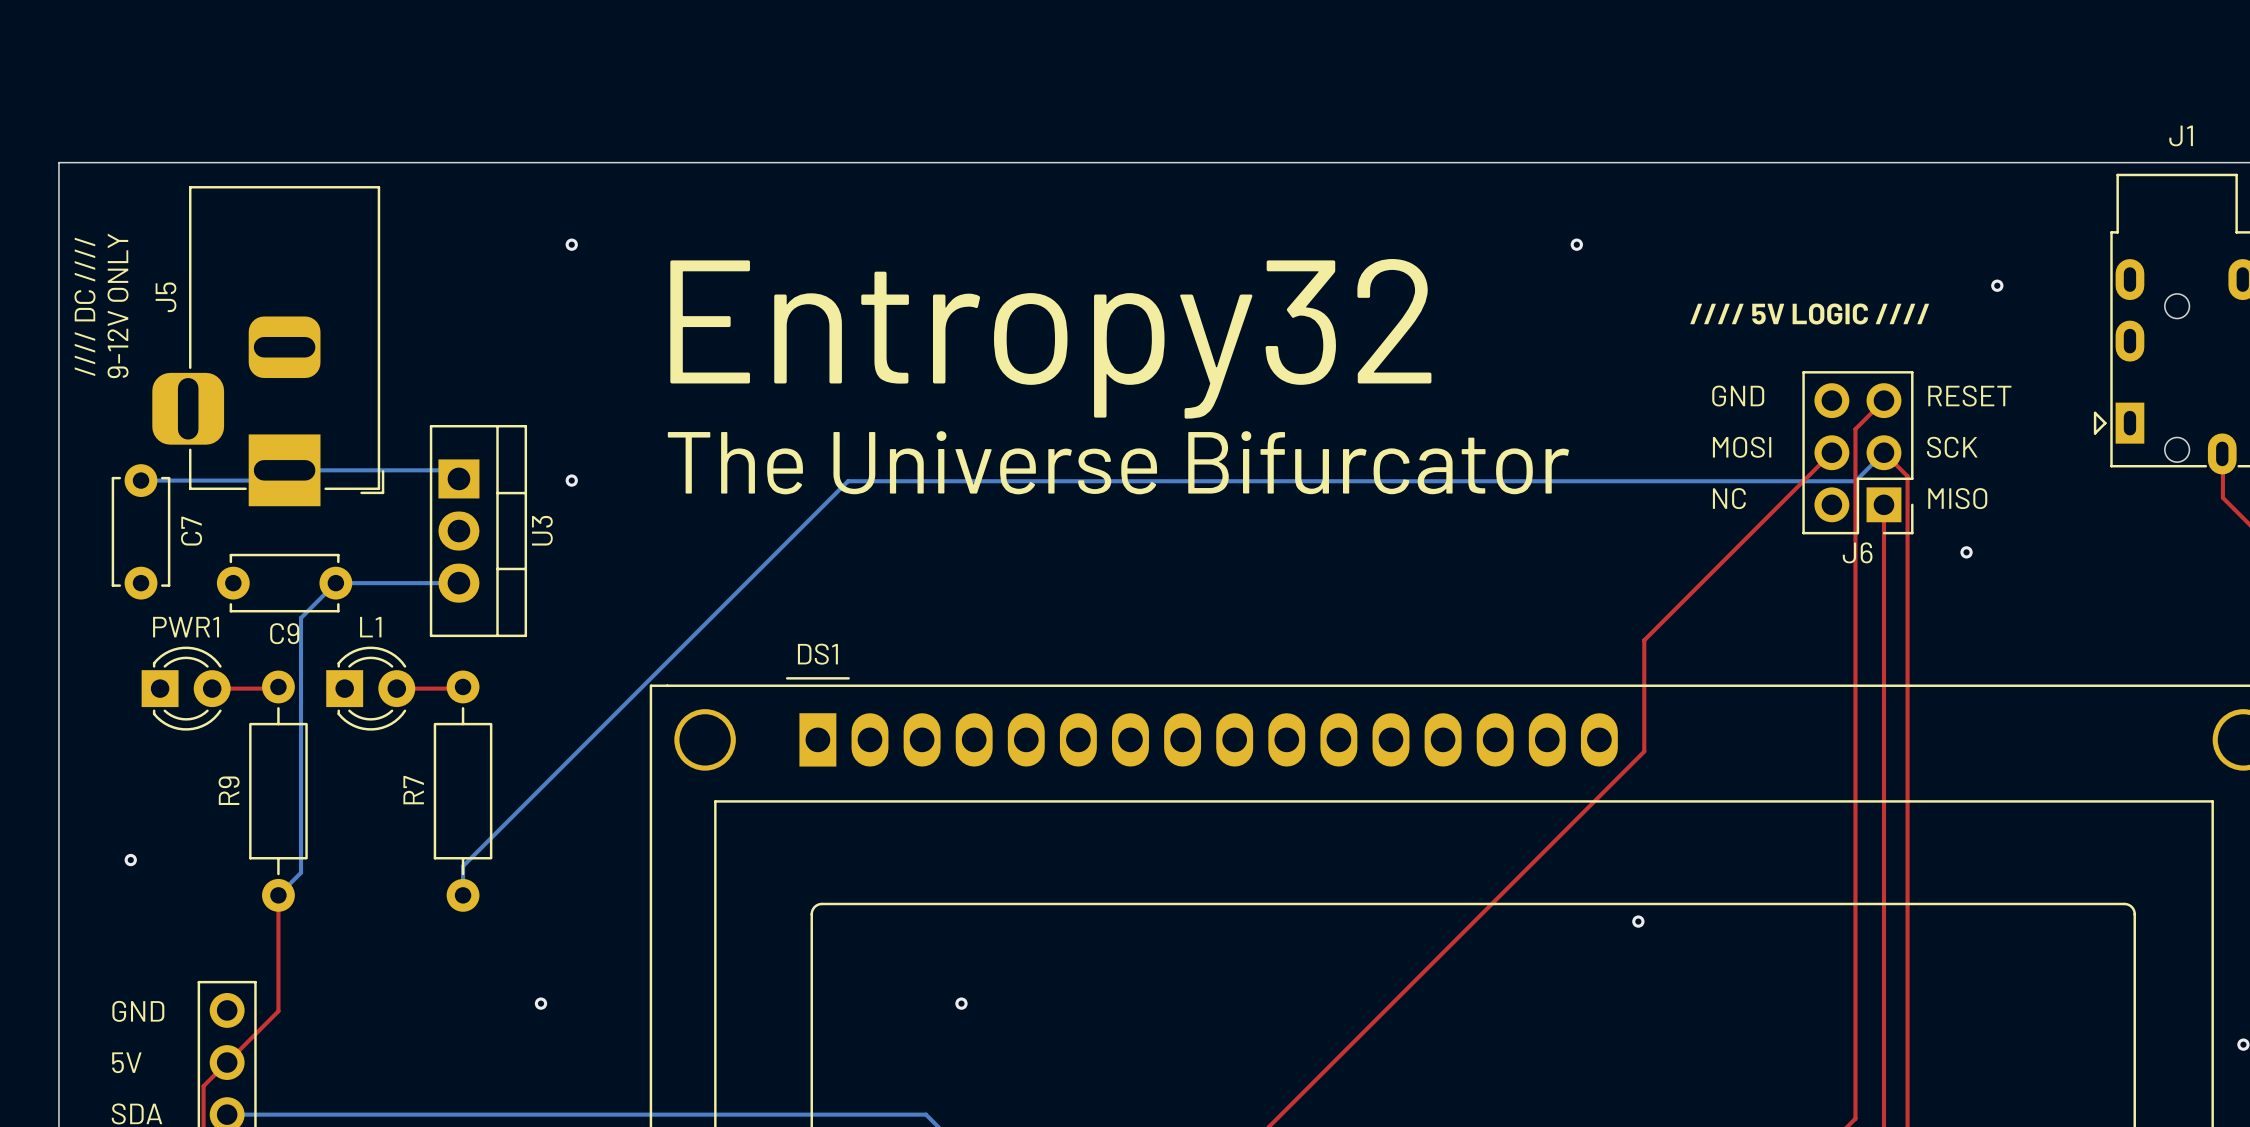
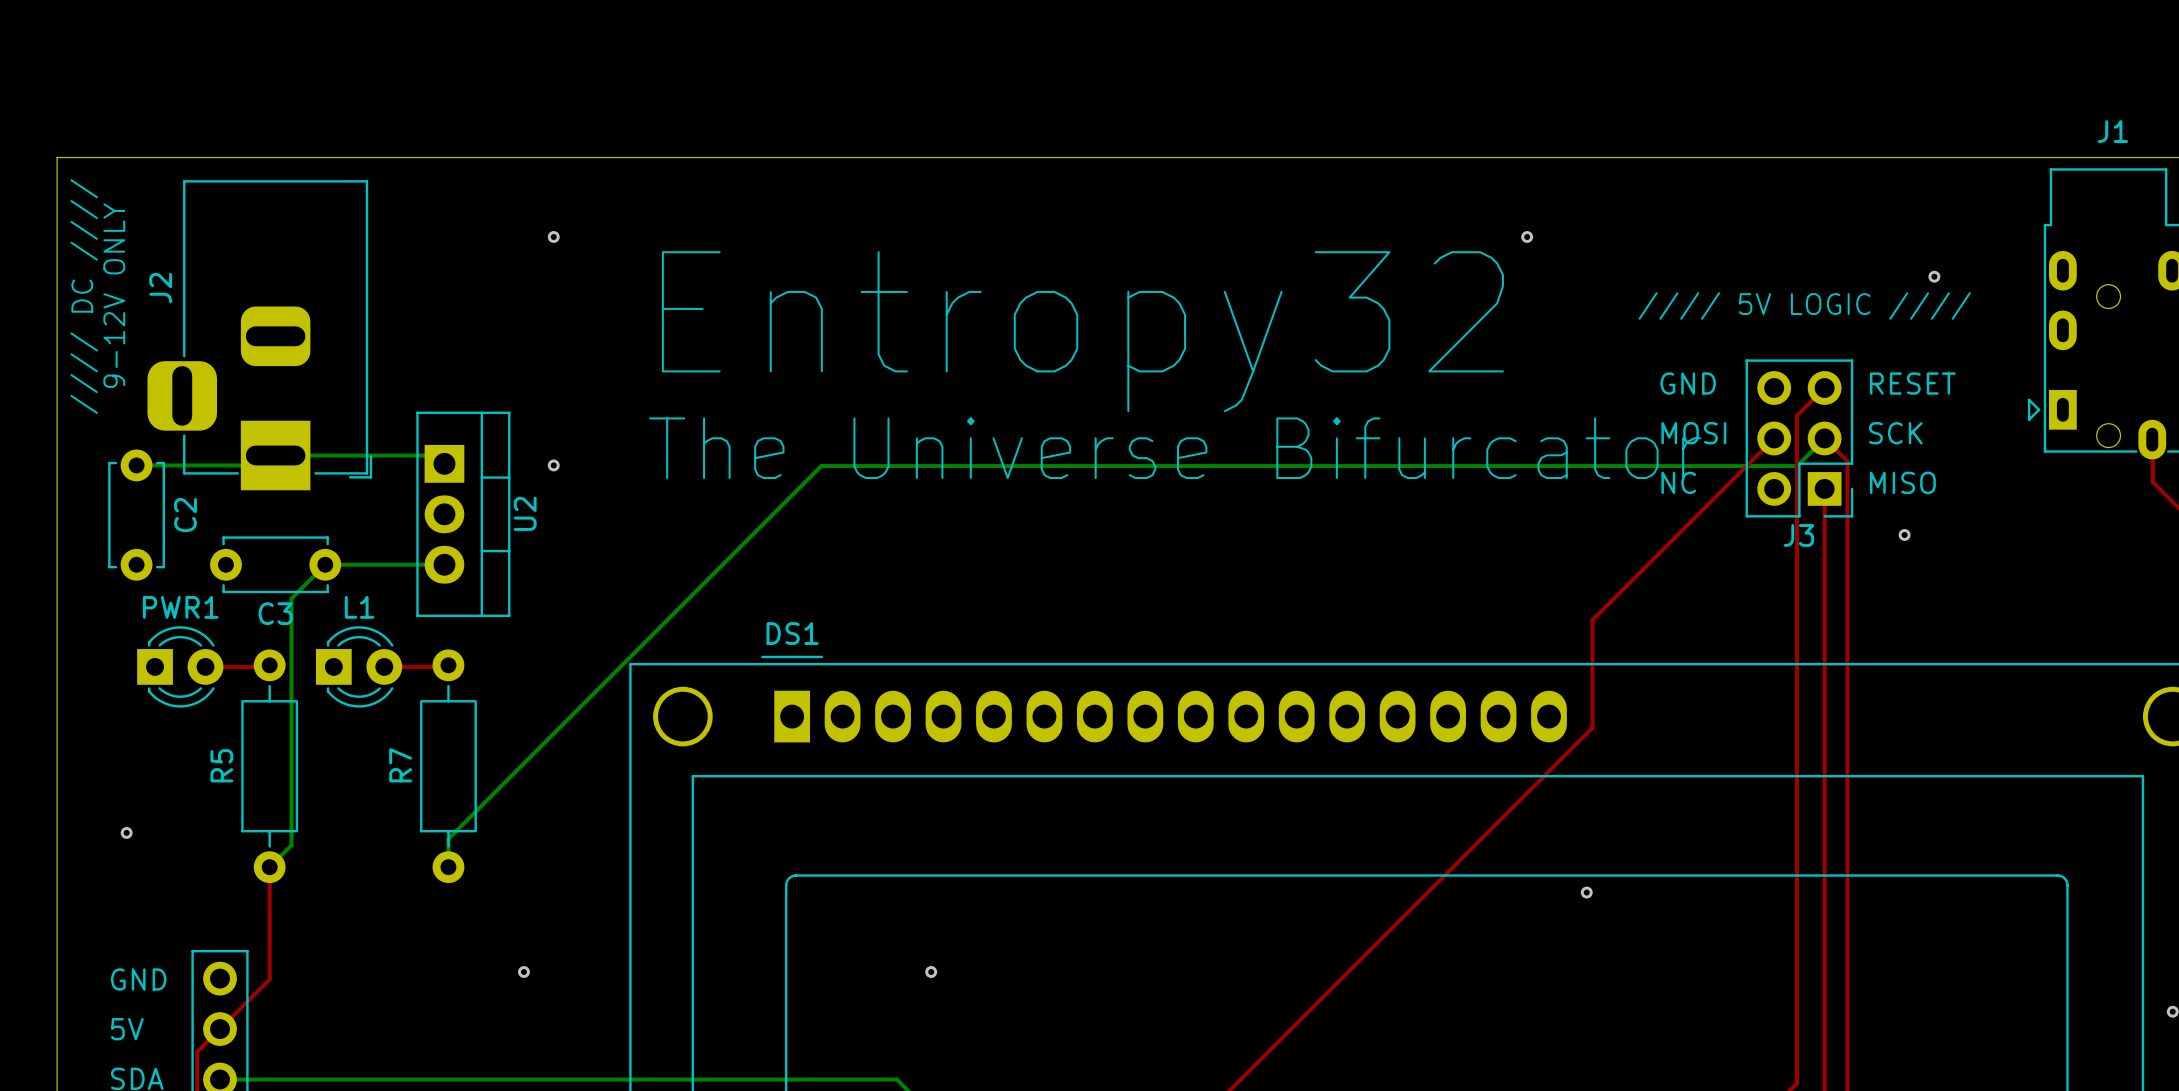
J5 name: J5 (166, 297) -> J2 (160, 288)
U3 name: U3 (542, 530) -> U2 (525, 513)
C7 name: C7 (191, 531) -> C2 (185, 515)
J6 name: J6 (1857, 552) -> J3 (1798, 535)
C9 name: C9 (284, 633) -> C3 (275, 613)
R9 name: R9 (229, 790) -> R5 (221, 765)

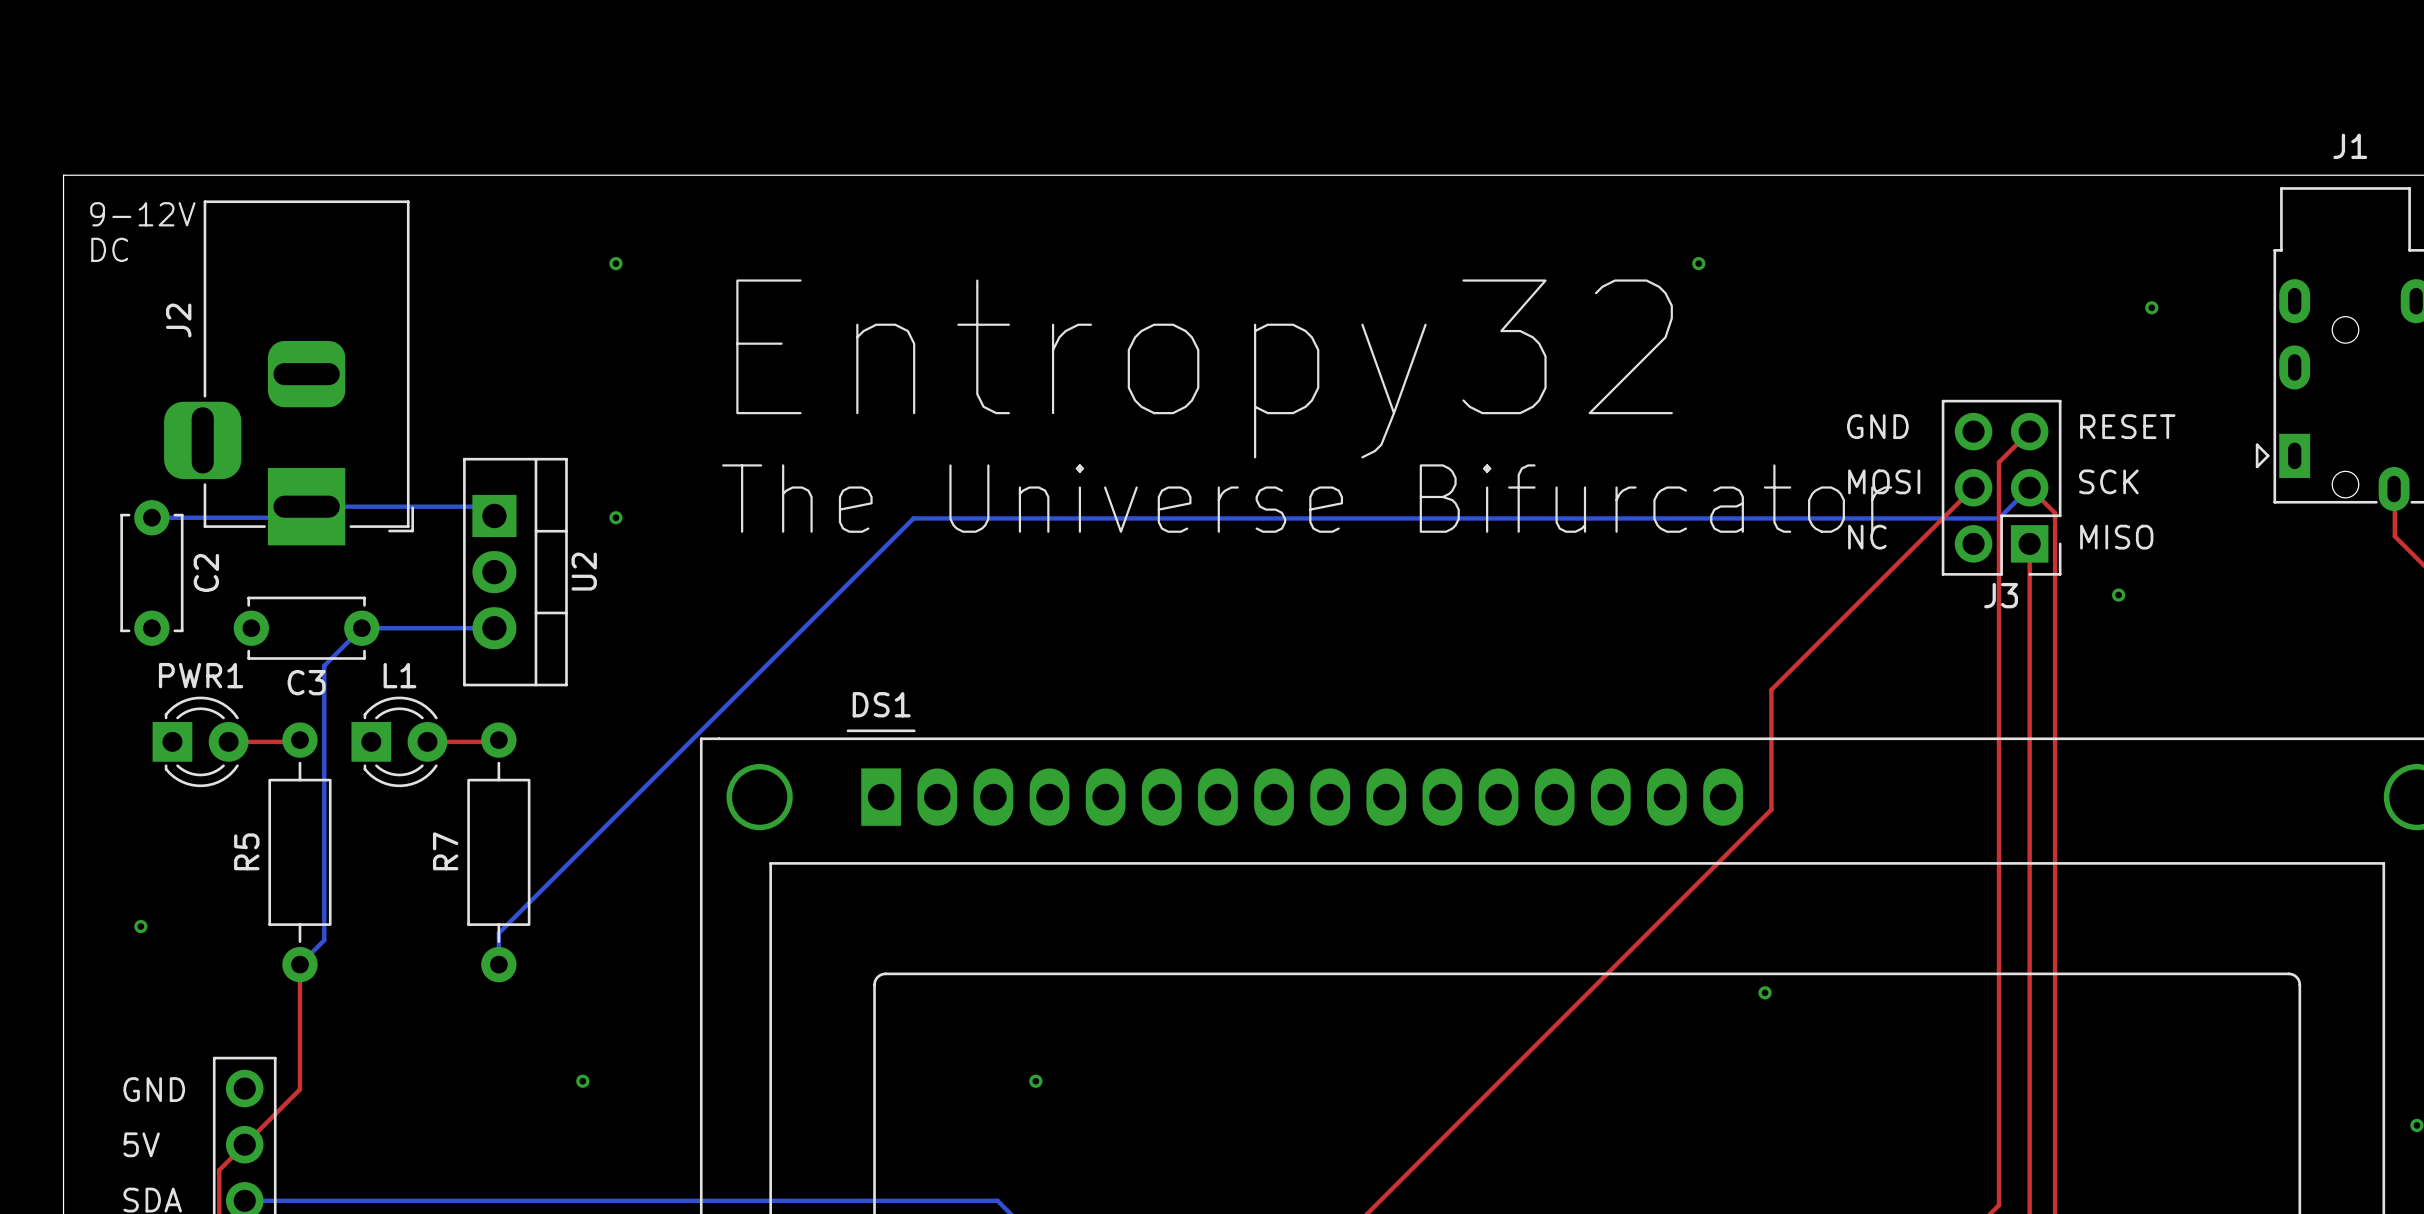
text: none -> DC (109, 249)
text: 9-12V ONLY (114, 295) -> 9-12V (142, 214)
text: //// DC //// (84, 296) -> none
text: //// 5V LOGIC //// (1804, 305) -> none

